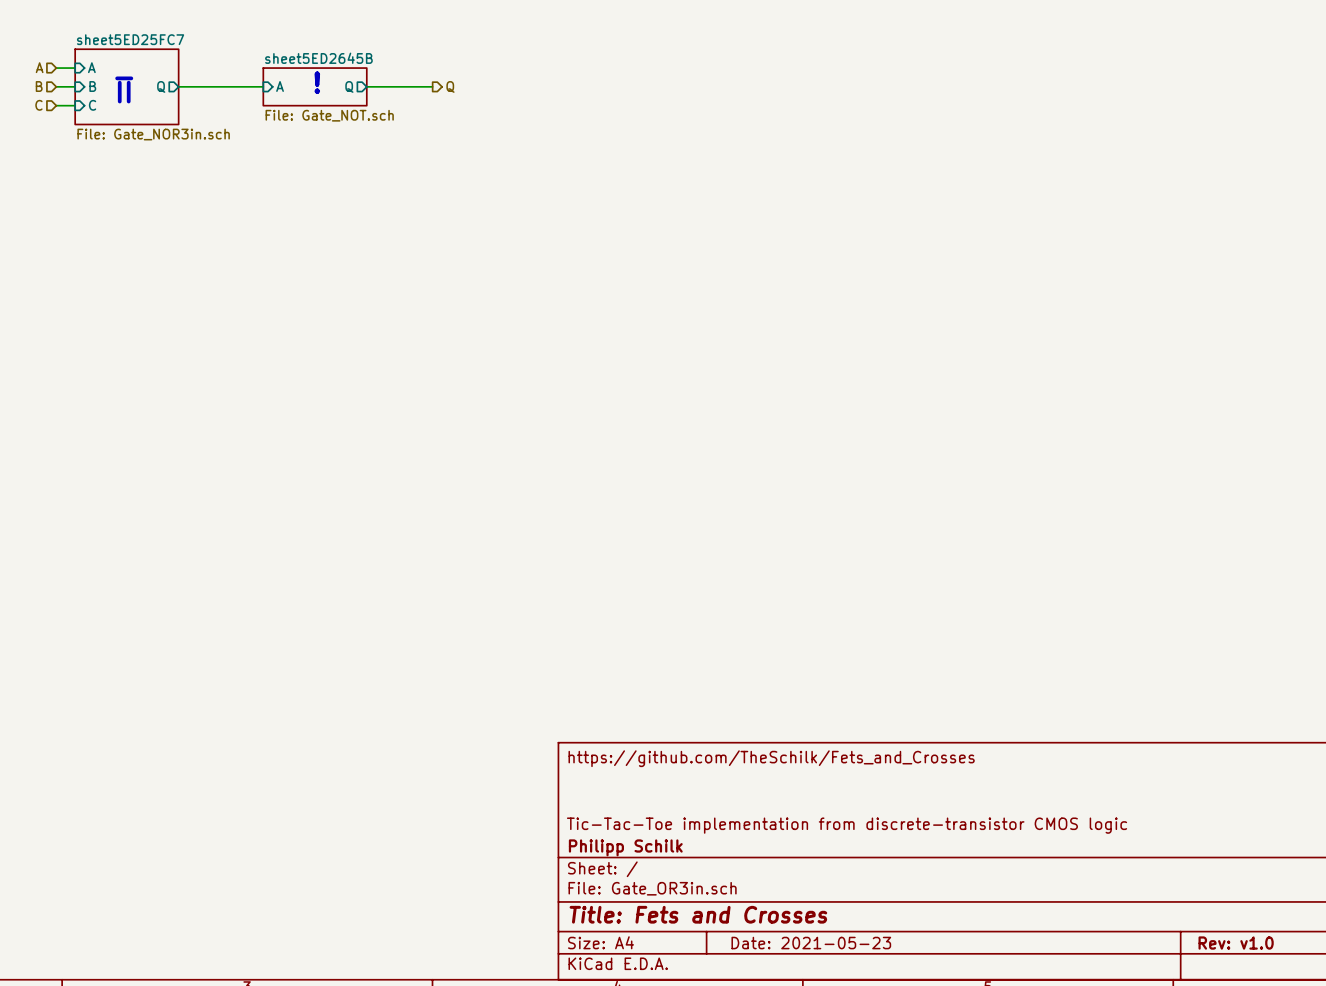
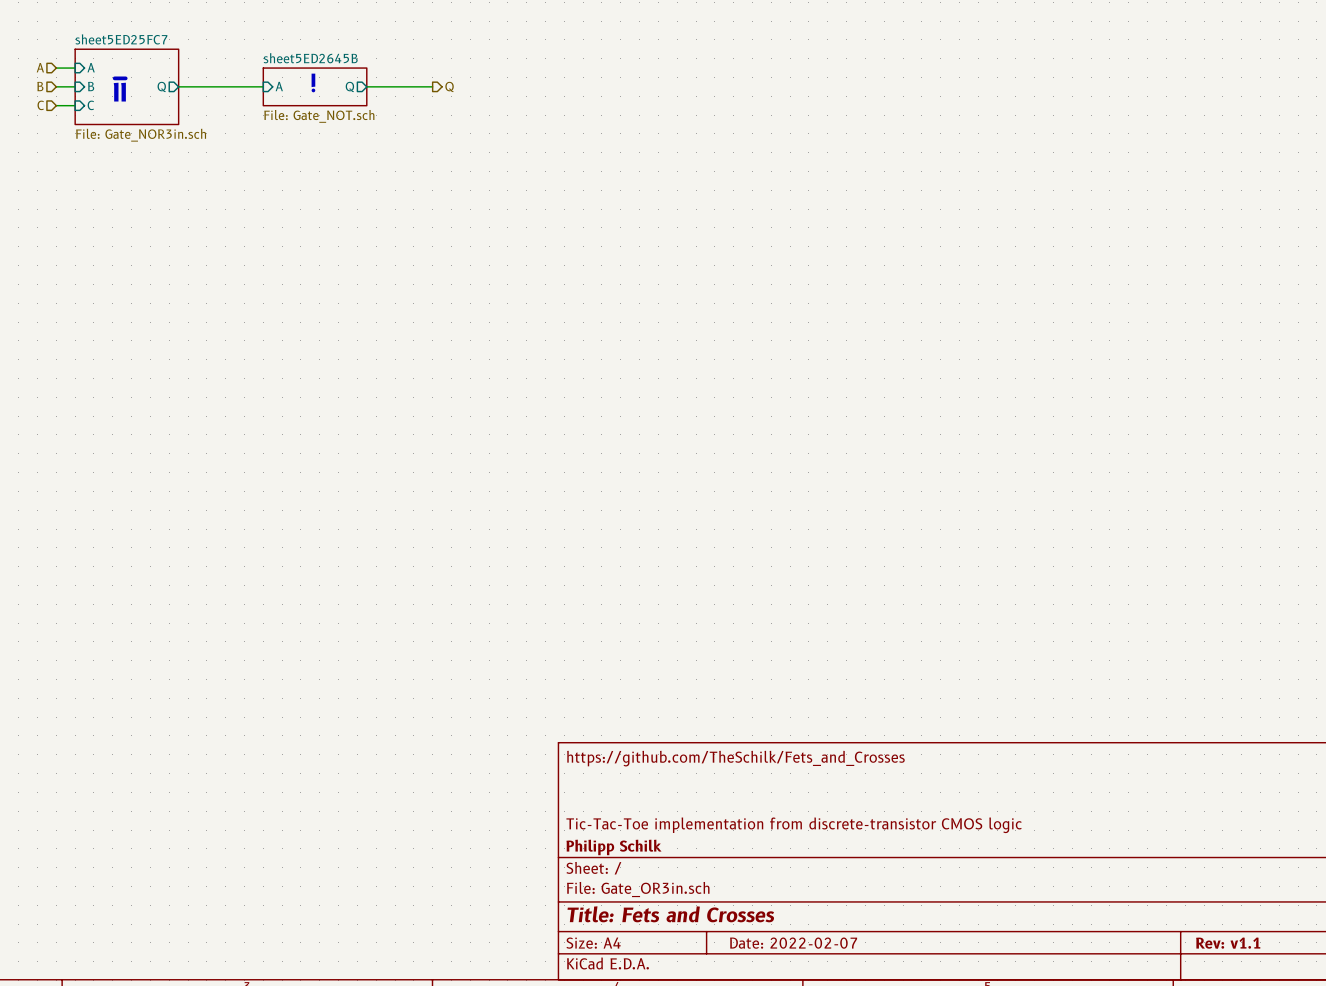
title block: Date: 2021-05-23 (811, 943) -> Date: 2022-02-07 (793, 943)
title block: Rev: v1.0 (1236, 943) -> Rev: v1.1 (1228, 943)

